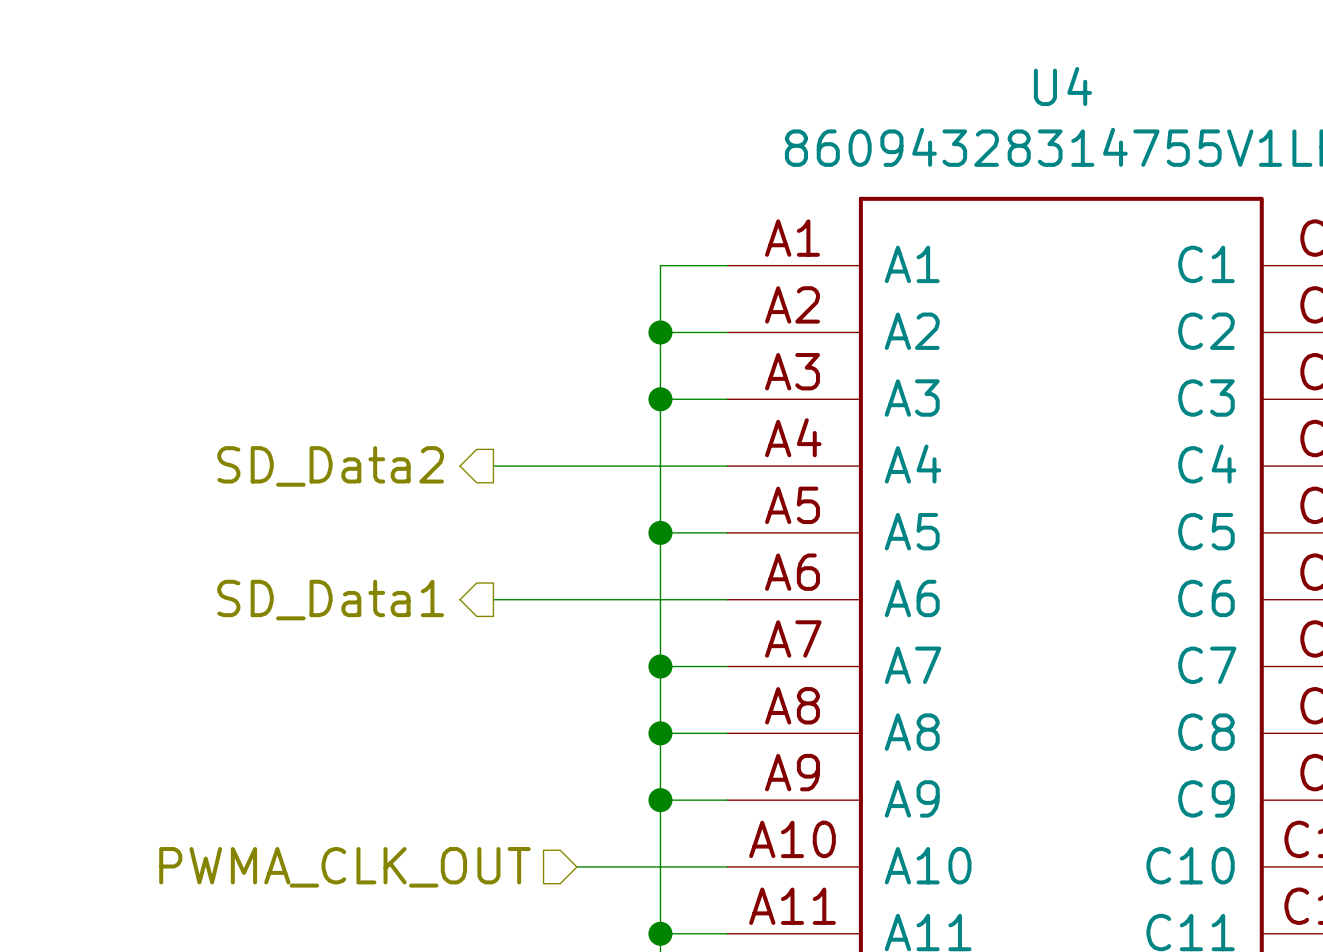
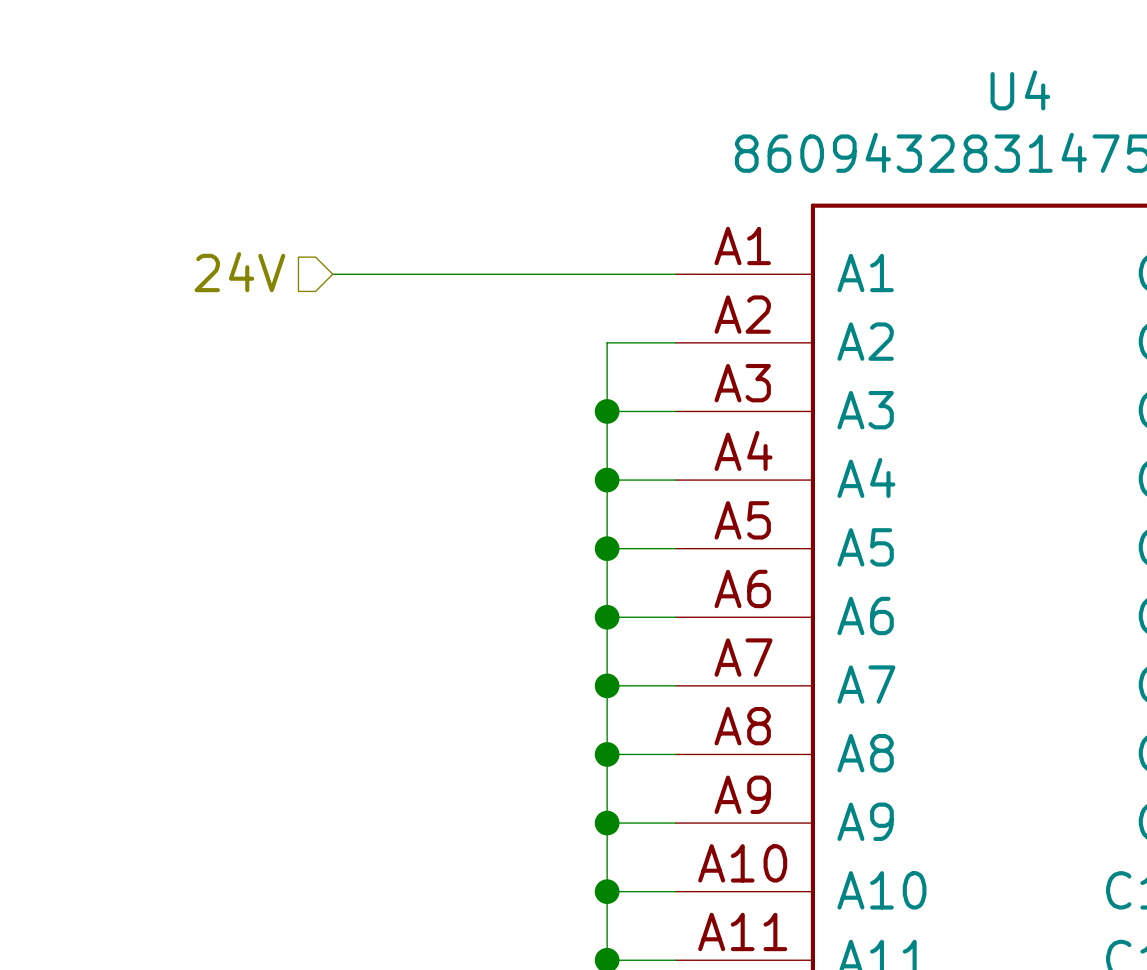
hierarchical label: none -> 24V (239, 272)
wire: (660, 265) (660, 332) -> (607, 274) (332, 274)
junction: (660, 332) -> none
hierarchical label: SD_Data2 (330, 466) -> none
wire: (493, 466) (660, 466) -> none
junction: none -> (607, 480)
wire: (493, 599) (660, 599) -> none
junction: none -> (607, 617)
hierarchical label: SD_Data1 (330, 600) -> none
wire: (576, 866) (660, 866) -> none
junction: none -> (607, 891)
hierarchical label: PWMA_CLK_OUT (344, 867) -> none

